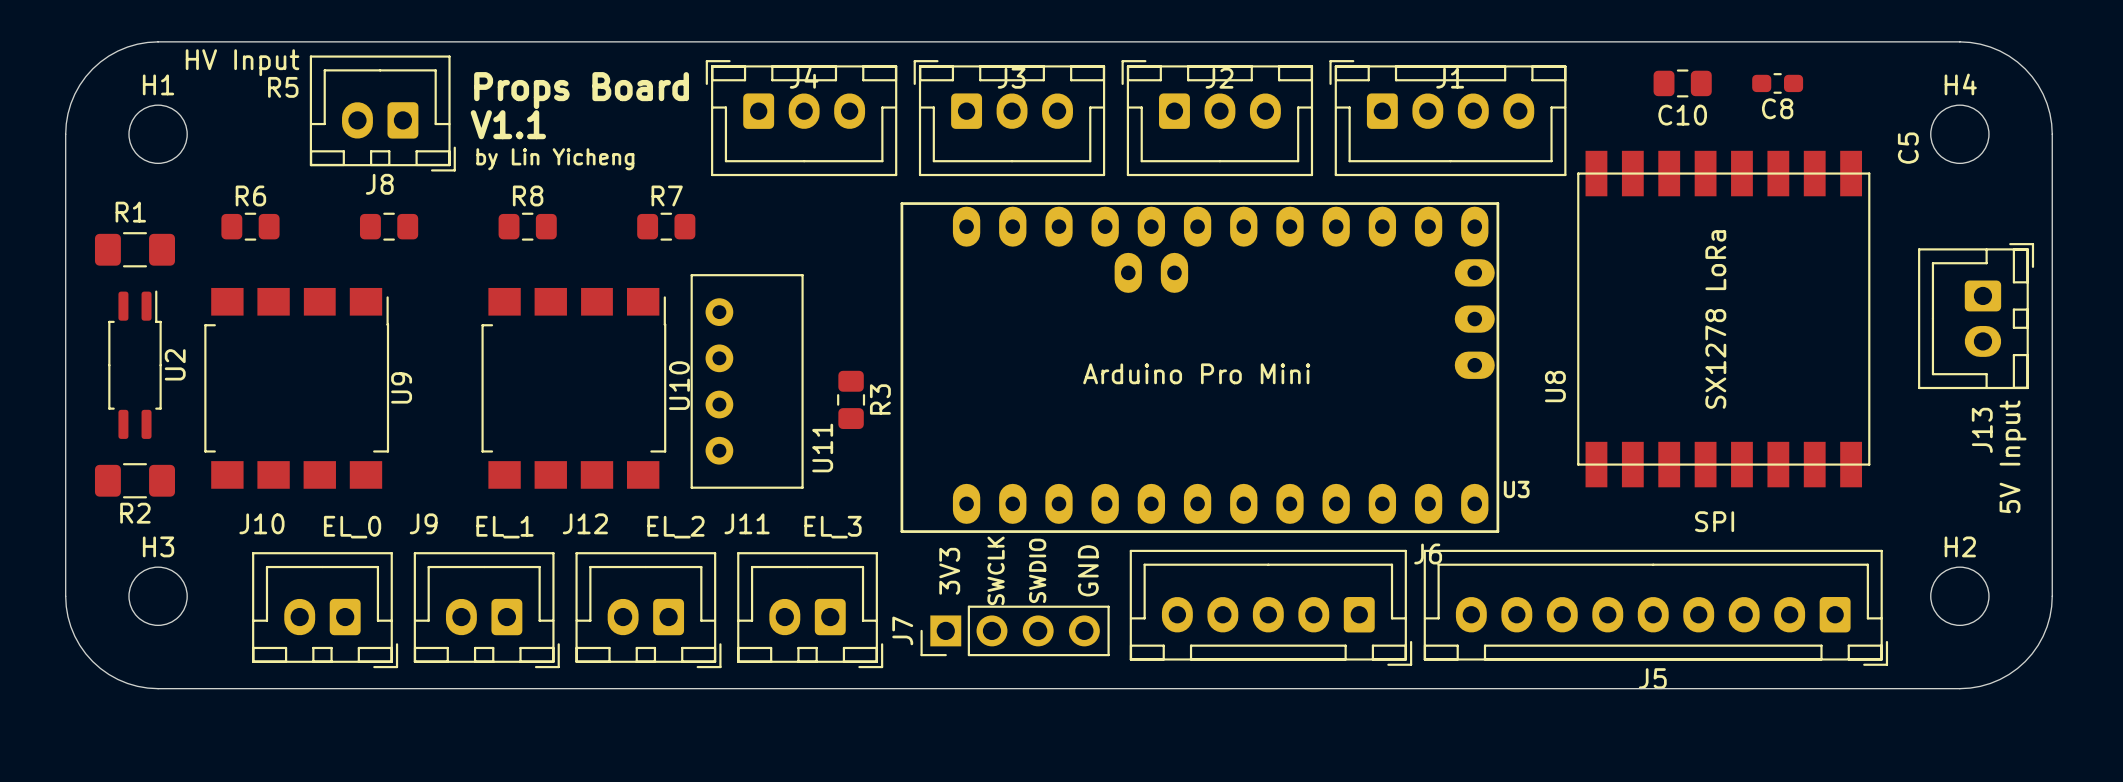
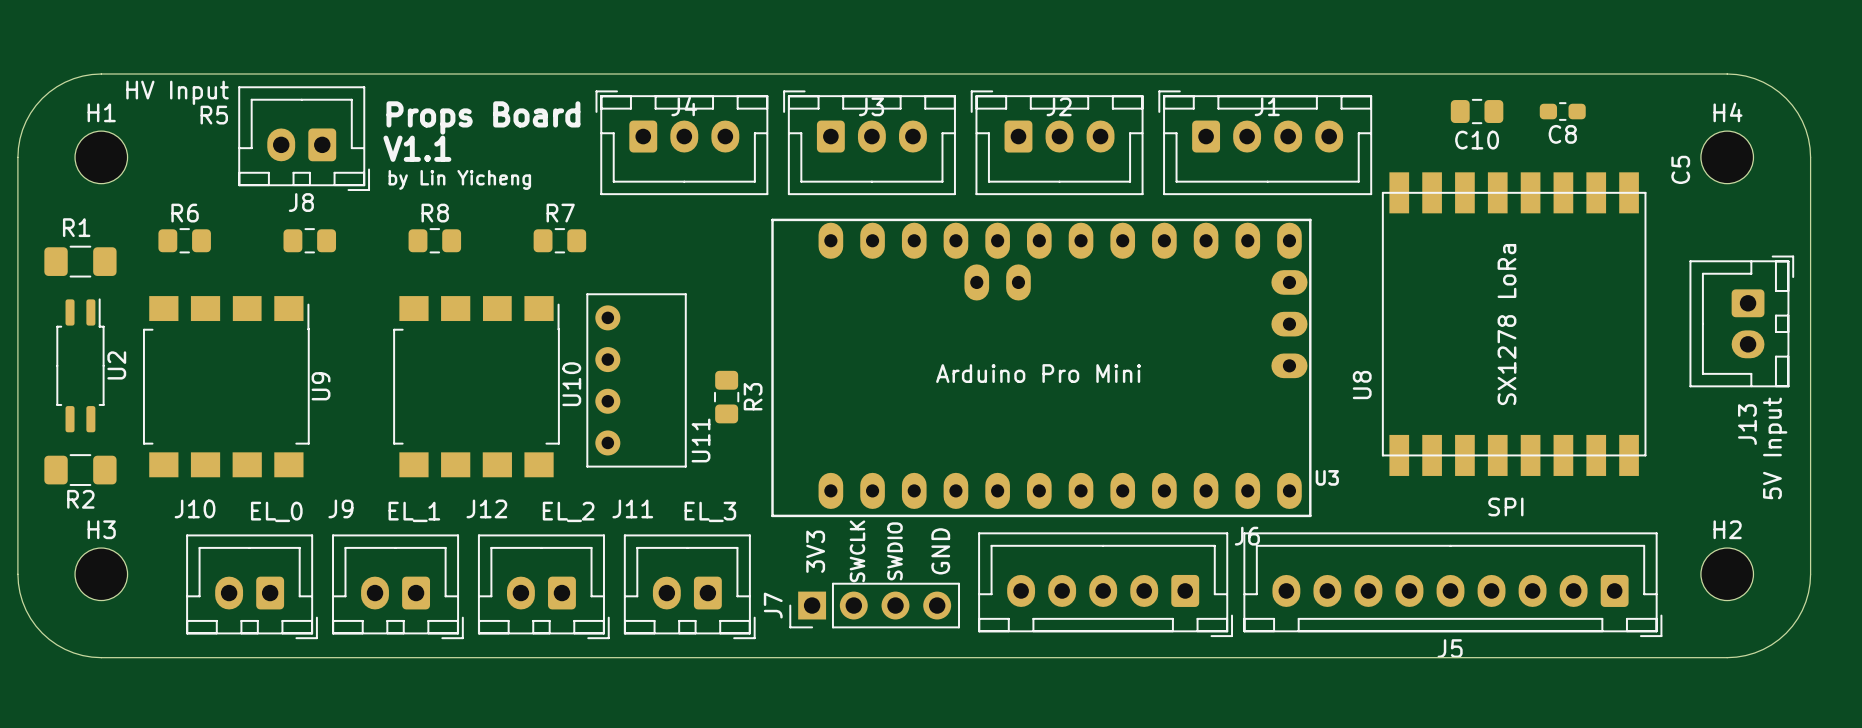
U11 footprint: [690, 274, 804, 489] -> [586, 293, 687, 468]

